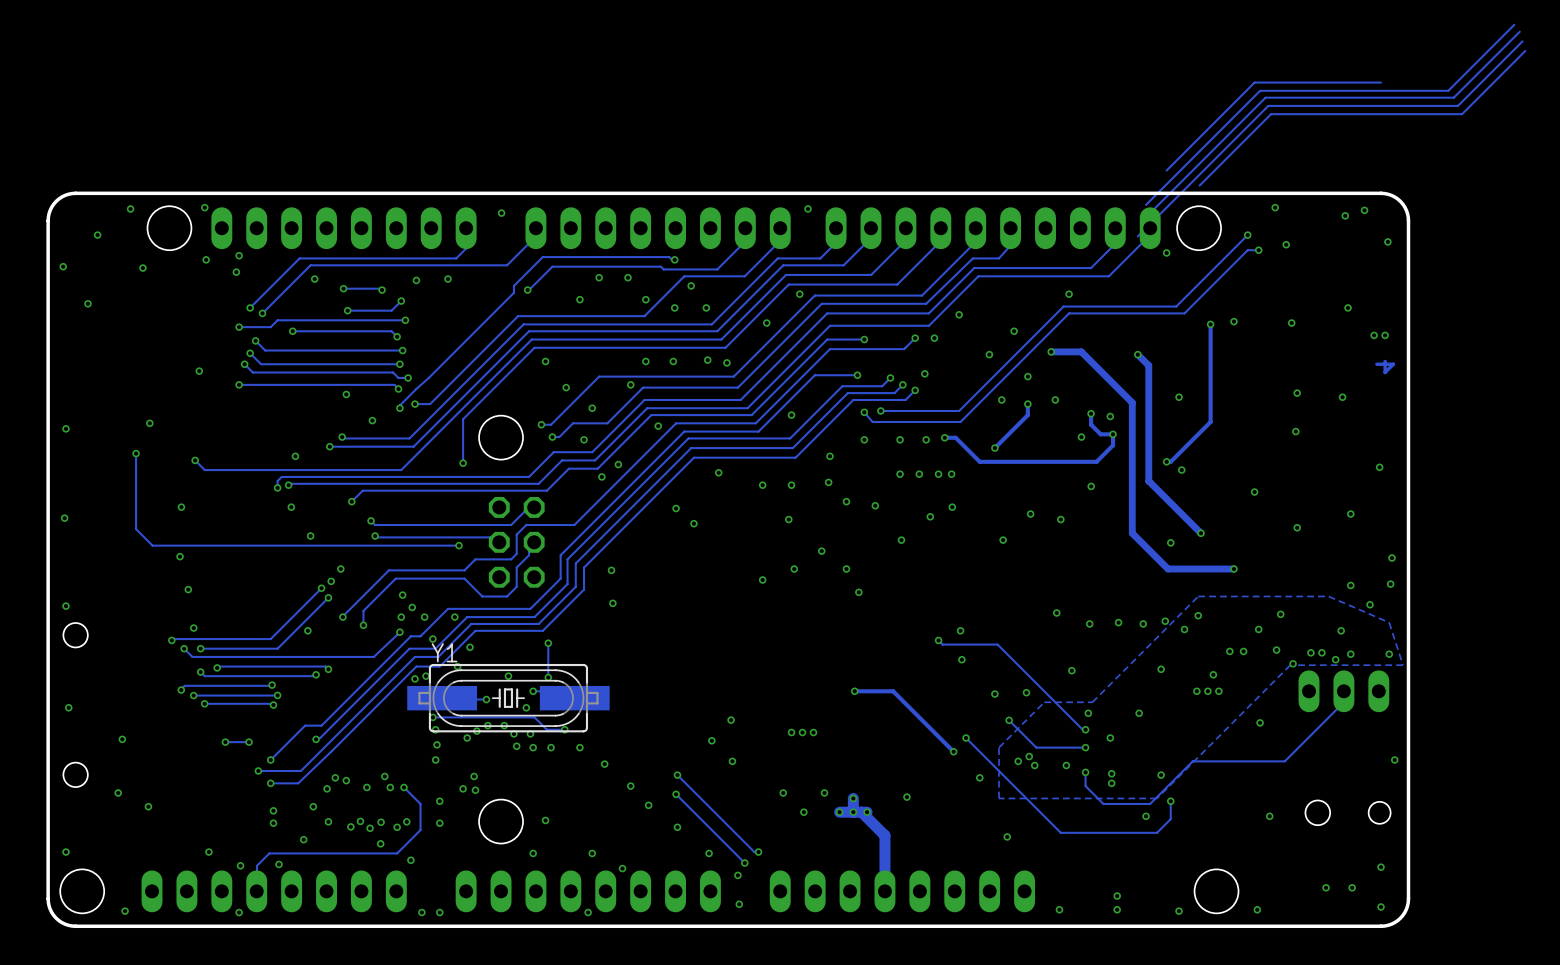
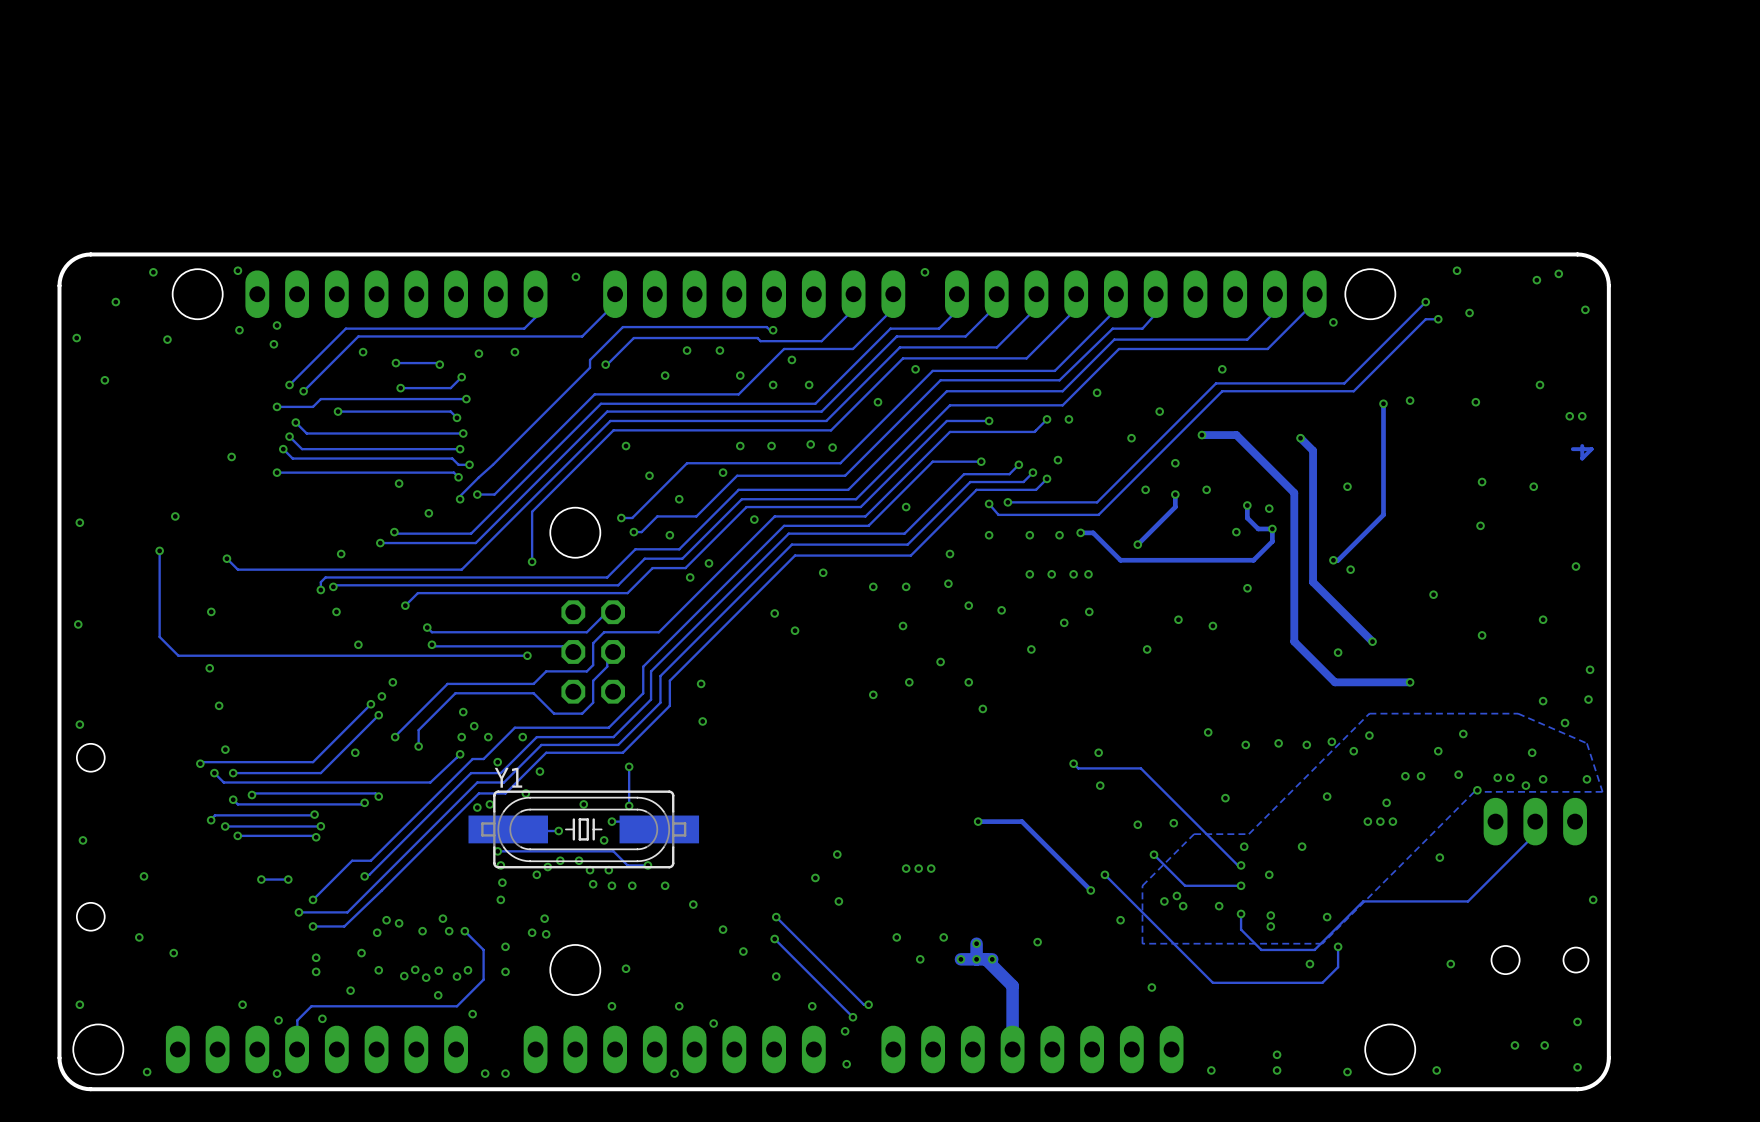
track: (1514, 24) (1448, 90) (1260, 90) (1146, 204) -> none
track: (1519, 31) (1453, 97) (1265, 97) (1150, 213) -> none
track: (1522, 41) (1457, 105) (1268, 105) (1137, 236) -> none
track: (1525, 50) (1462, 114) (1271, 114) (1199, 185) -> none
track: (1381, 82) (1254, 82) (1166, 170) -> none

